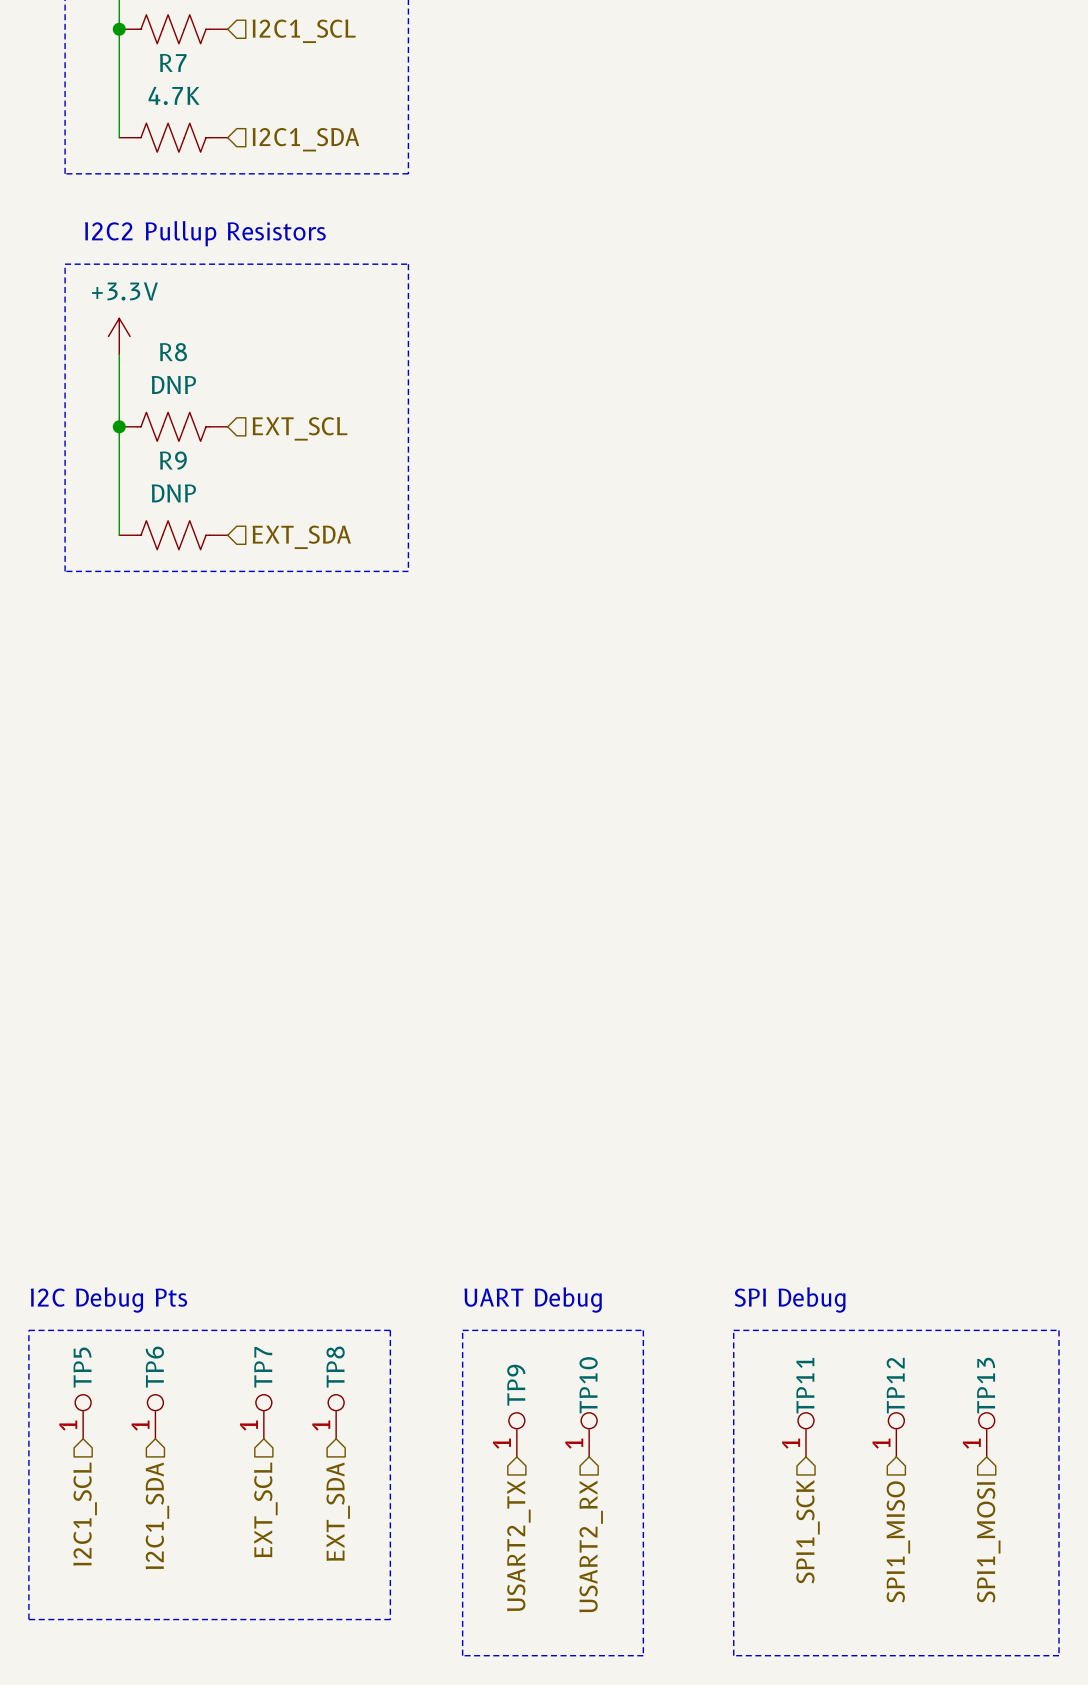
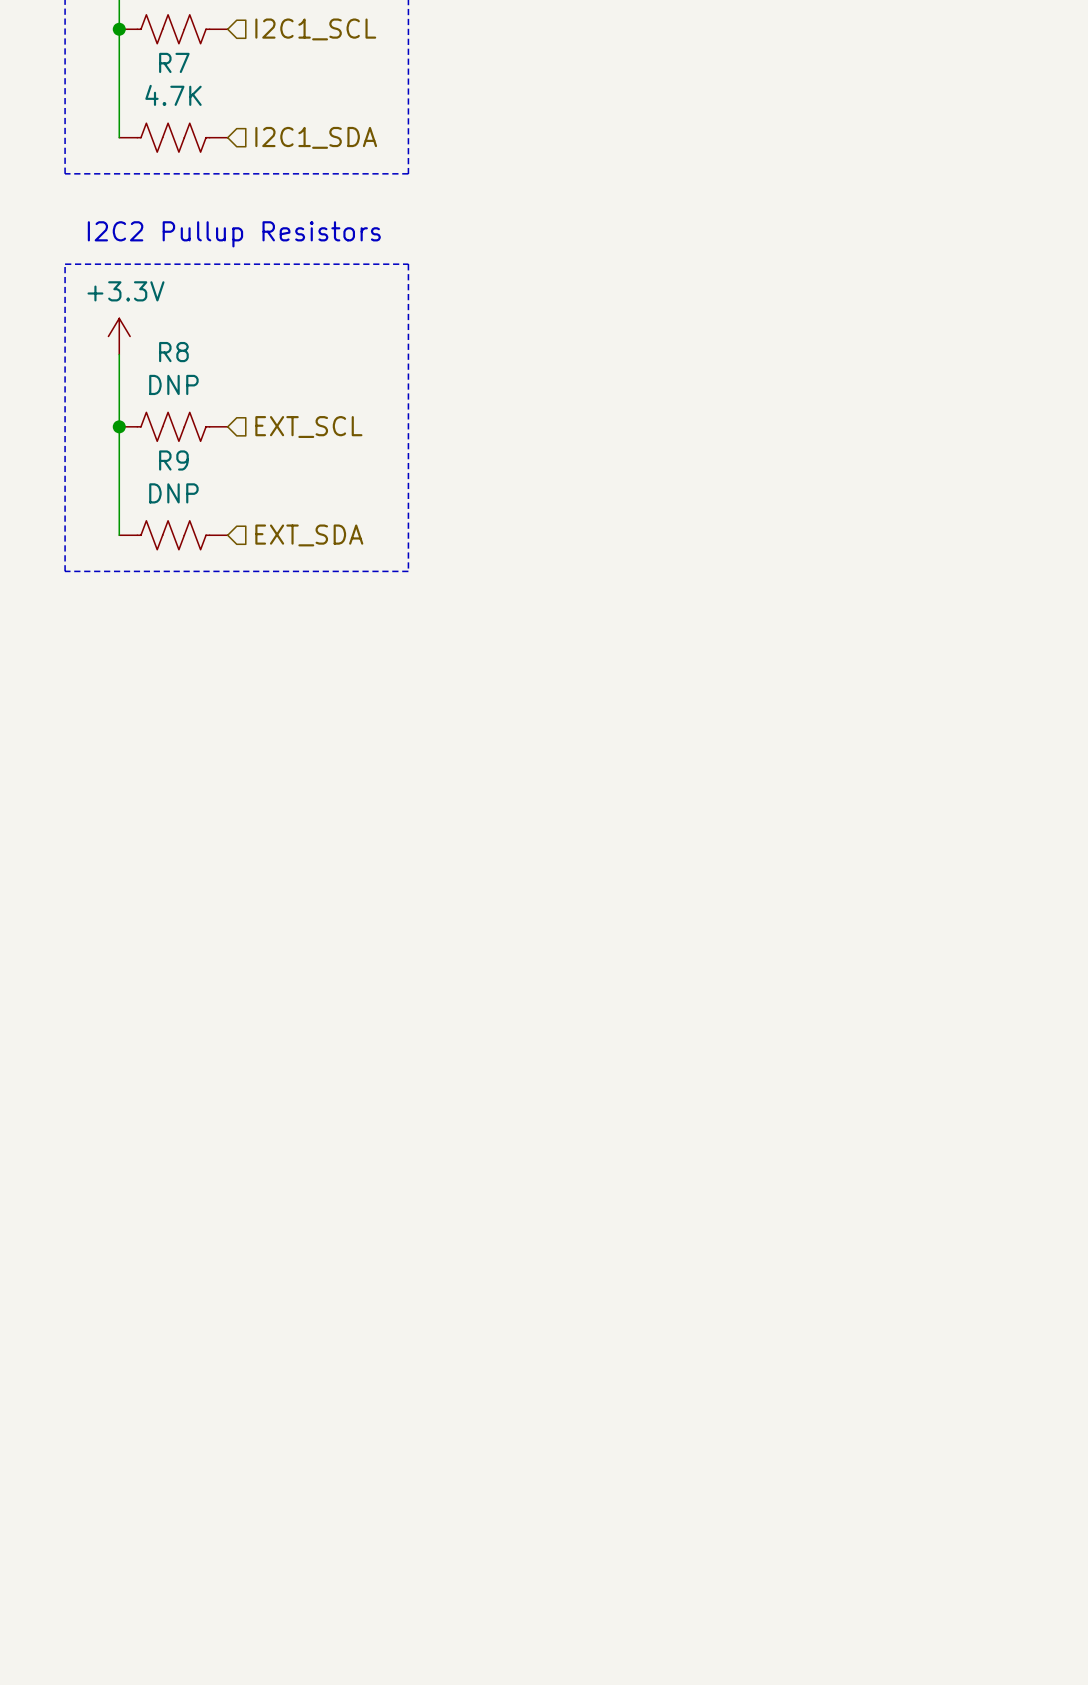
text: I2C Debug Pts (108, 1300) -> none
text: UART Debug (533, 1300) -> none
text: SPI Debug (790, 1300) -> none
line: (28, 1330) (390, 1330) (390, 1619) (28, 1619) (28, 1330) -> none
line: (462, 1330) (643, 1330) (643, 1655) (462, 1655) (462, 1330) -> none
line: (733, 1330) (1058, 1330) (1058, 1655) (733, 1655) (733, 1330) -> none
TP5: (83, 1416) -> none
TP6: (155, 1416) -> none
TP7: (263, 1416) -> none
TP8: (336, 1416) -> none
TP9: (516, 1434) -> none
TP10: (589, 1434) -> none
TP11: (805, 1434) -> none
TP12: (896, 1434) -> none
TP13: (986, 1434) -> none
hierarchical label: EXT_SCL (265, 1509) -> none
hierarchical label: EXT_SDA (338, 1511) -> none
hierarchical label: I2C1_SCL (85, 1514) -> none
hierarchical label: I2C1_SDA (157, 1515) -> none
hierarchical label: SPI1_SCK (808, 1531) -> none
hierarchical label: SPI1_MISO (898, 1541) -> none
hierarchical label: SPI1_MOSI (988, 1542) -> none
hierarchical label: USART2_TX (518, 1545) -> none
hierarchical label: USART2_RX (591, 1546) -> none

